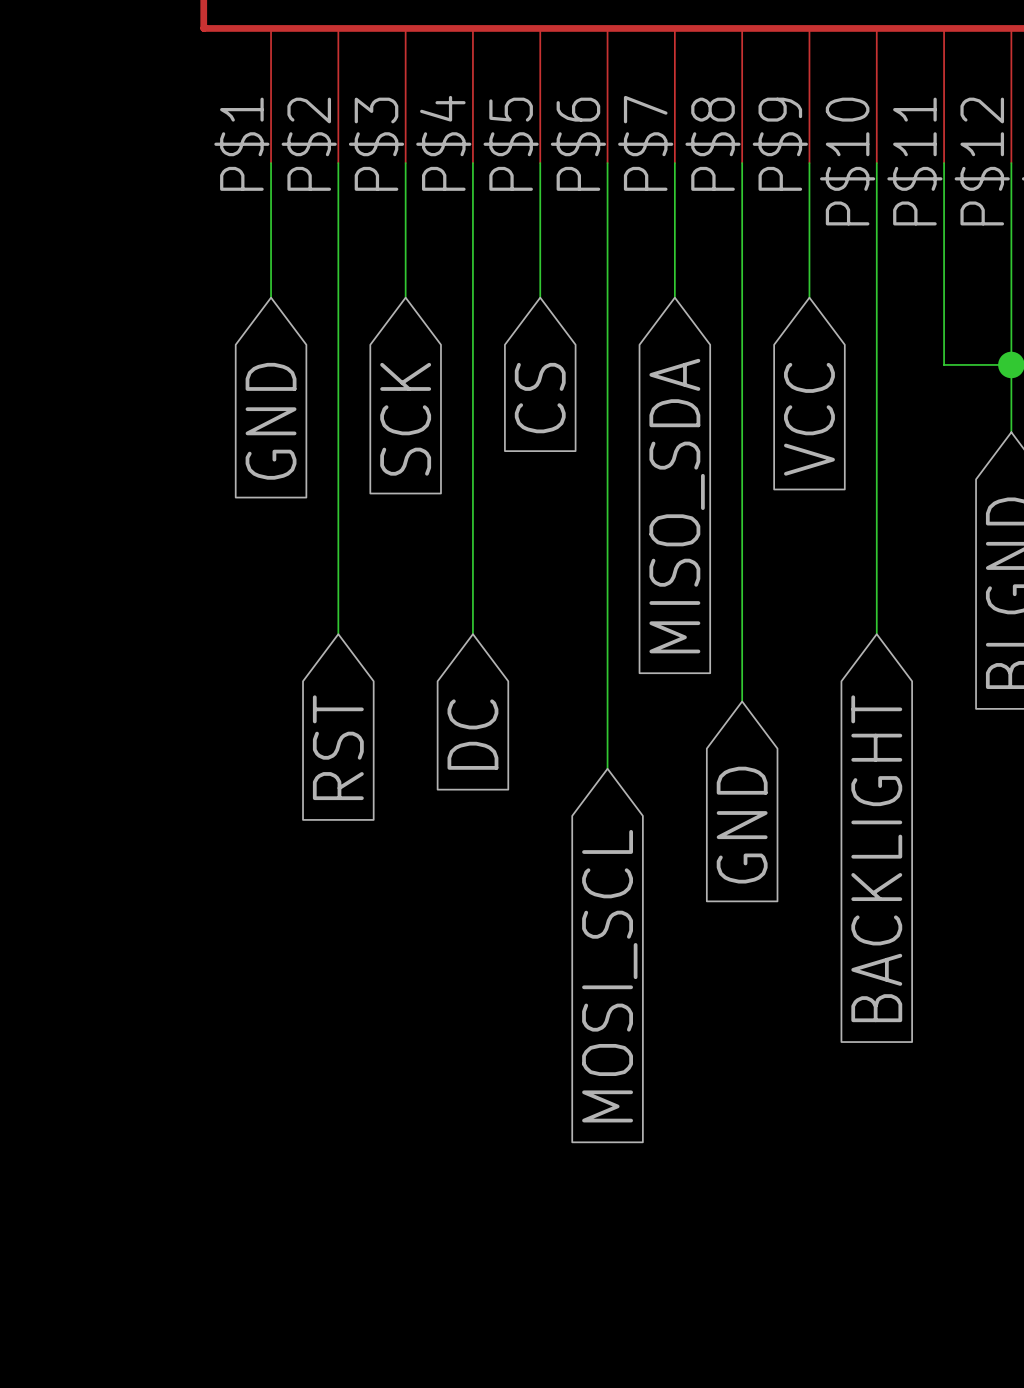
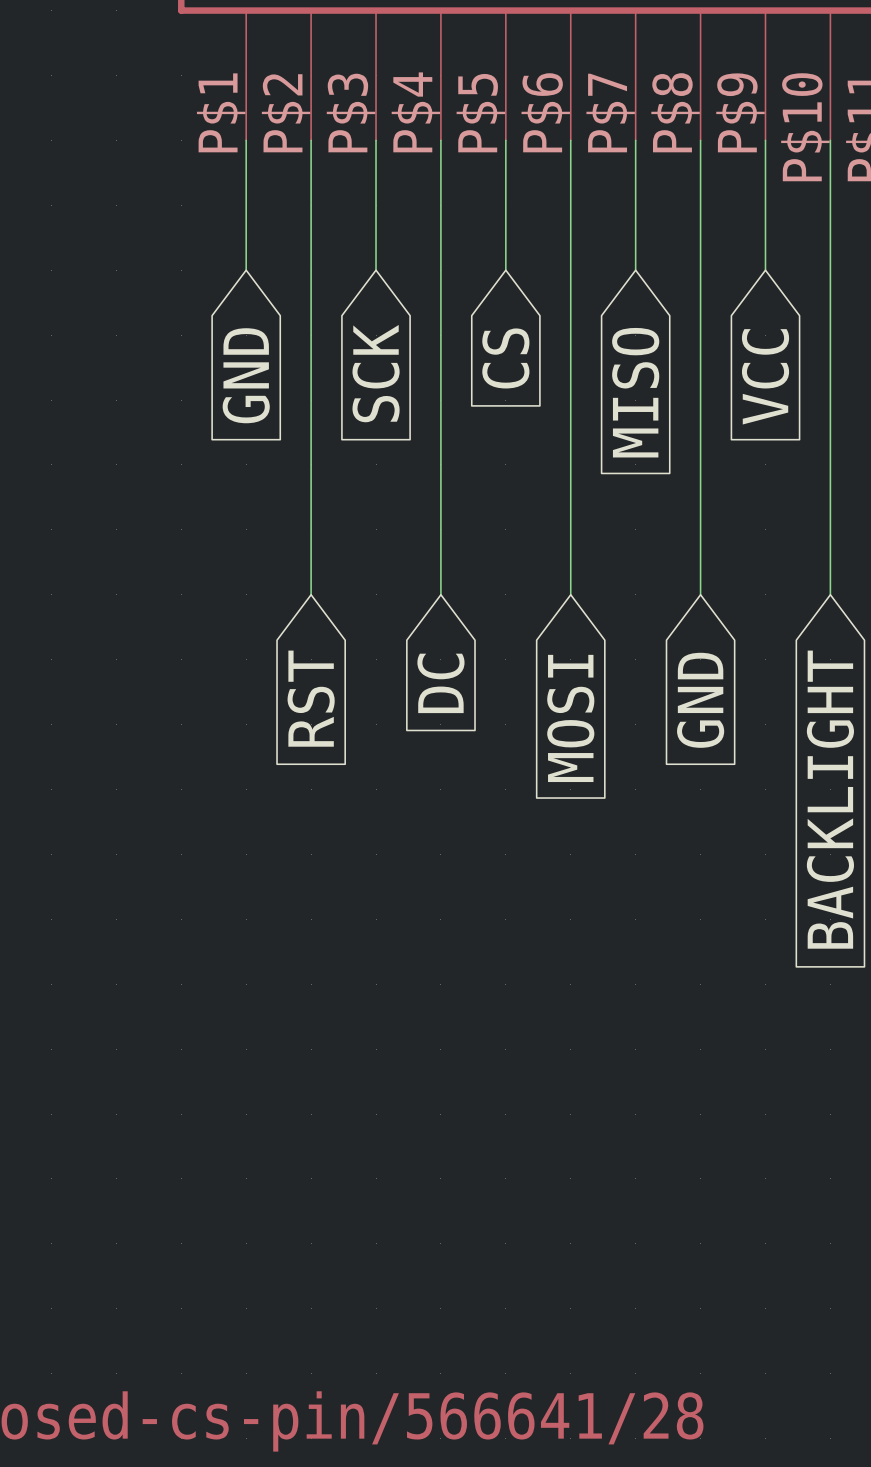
global label: MISO_SDA (677, 506) -> MISO (635, 392)
wire: (607, 634) (607, 768) -> none
wire: (742, 634) (742, 701) -> none
global label position: GND (742, 825) -> GND (700, 700)
global label: MOSI_SCL (609, 976) -> MOSI (570, 718)

